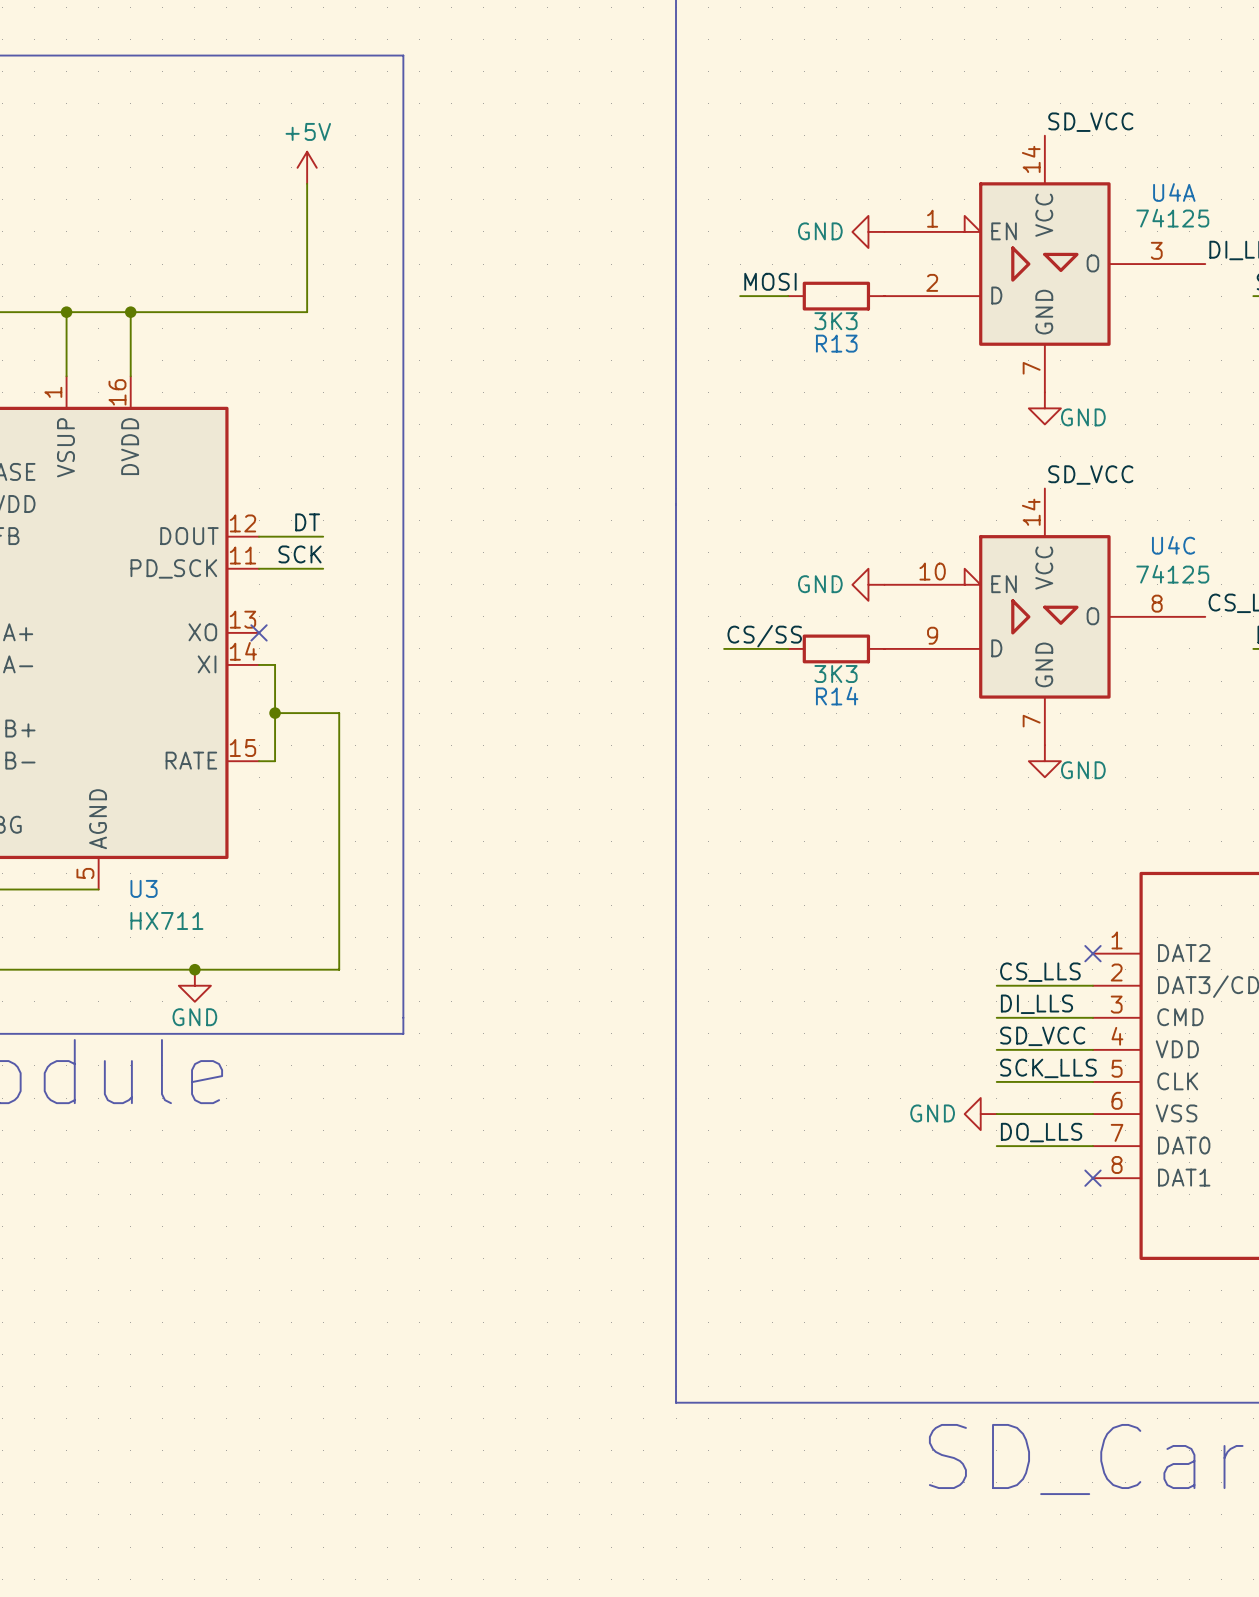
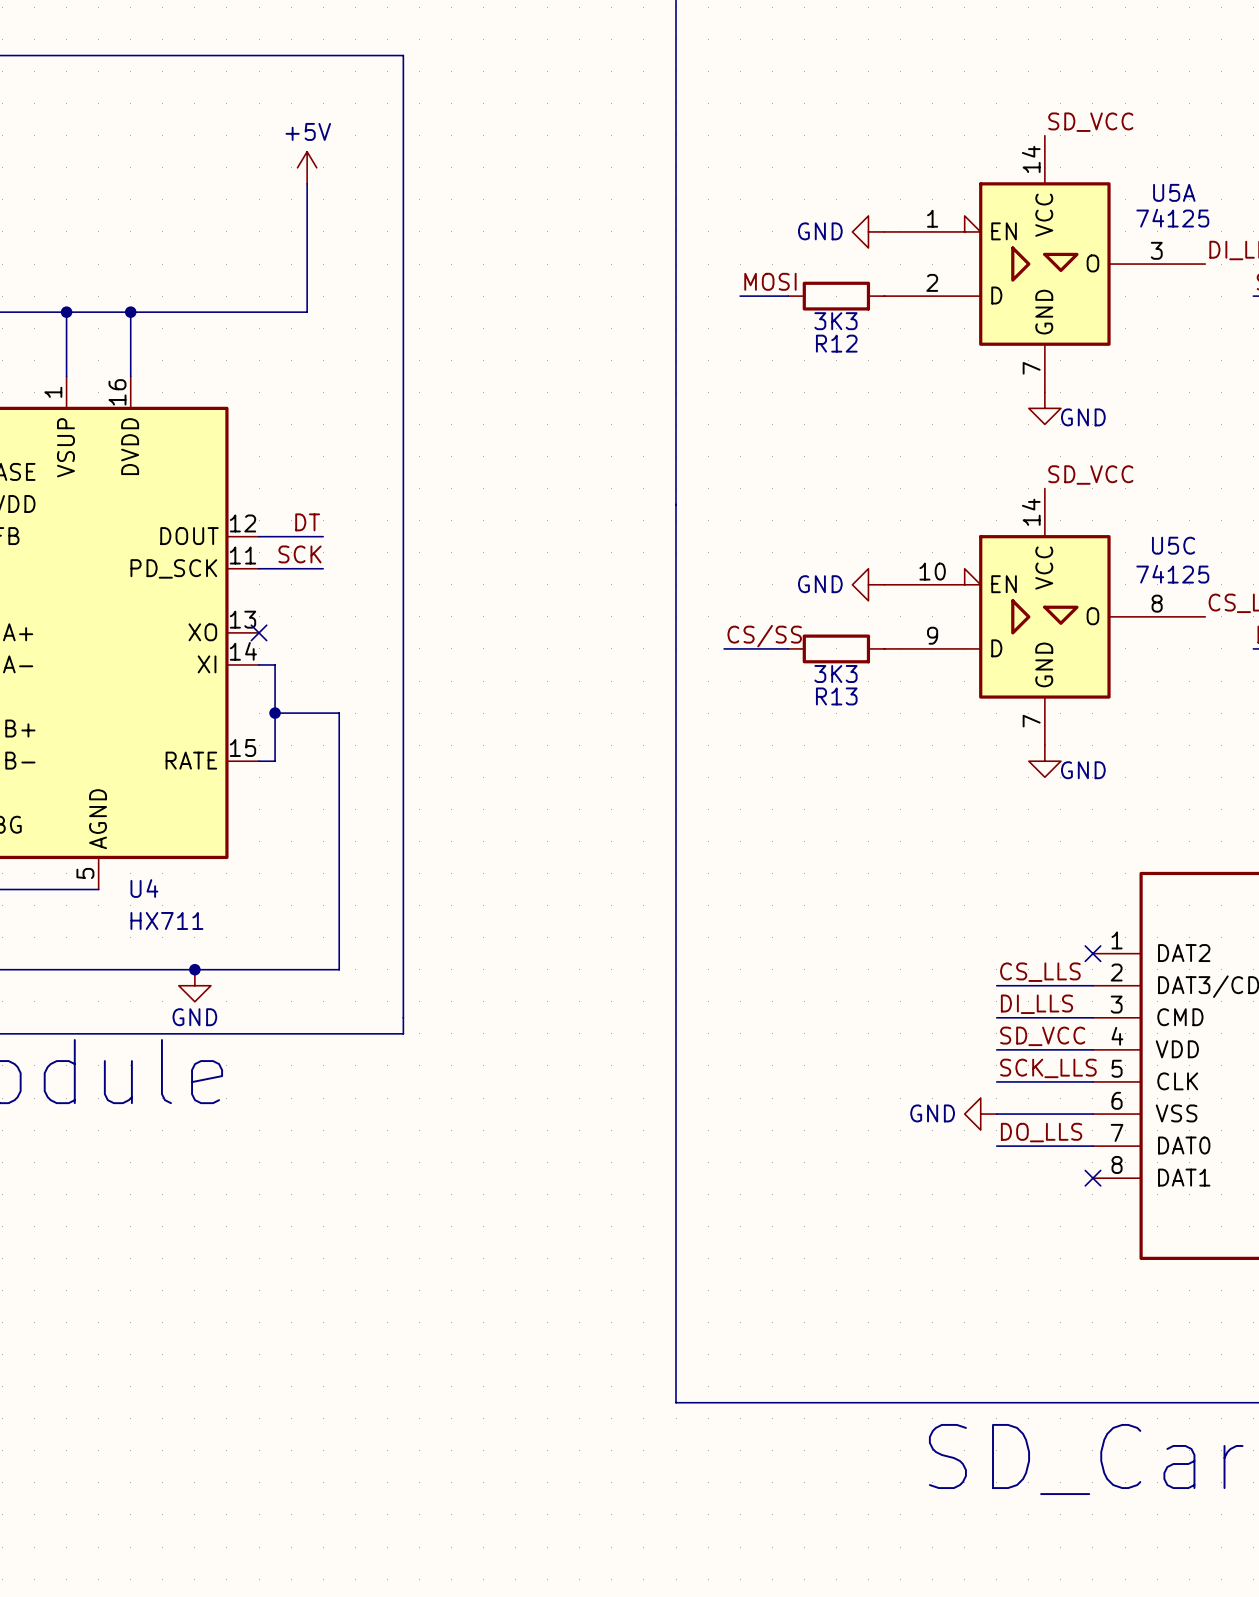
U4A name: U4A (1174, 192) -> U5A (1174, 192)
R13 name: R13 (836, 343) -> R12 (836, 343)
U4C name: U4C (1173, 545) -> U5C (1173, 545)
R14 name: R14 (837, 696) -> R13 (836, 696)
U3 name: U3 (144, 888) -> U4 (144, 888)

